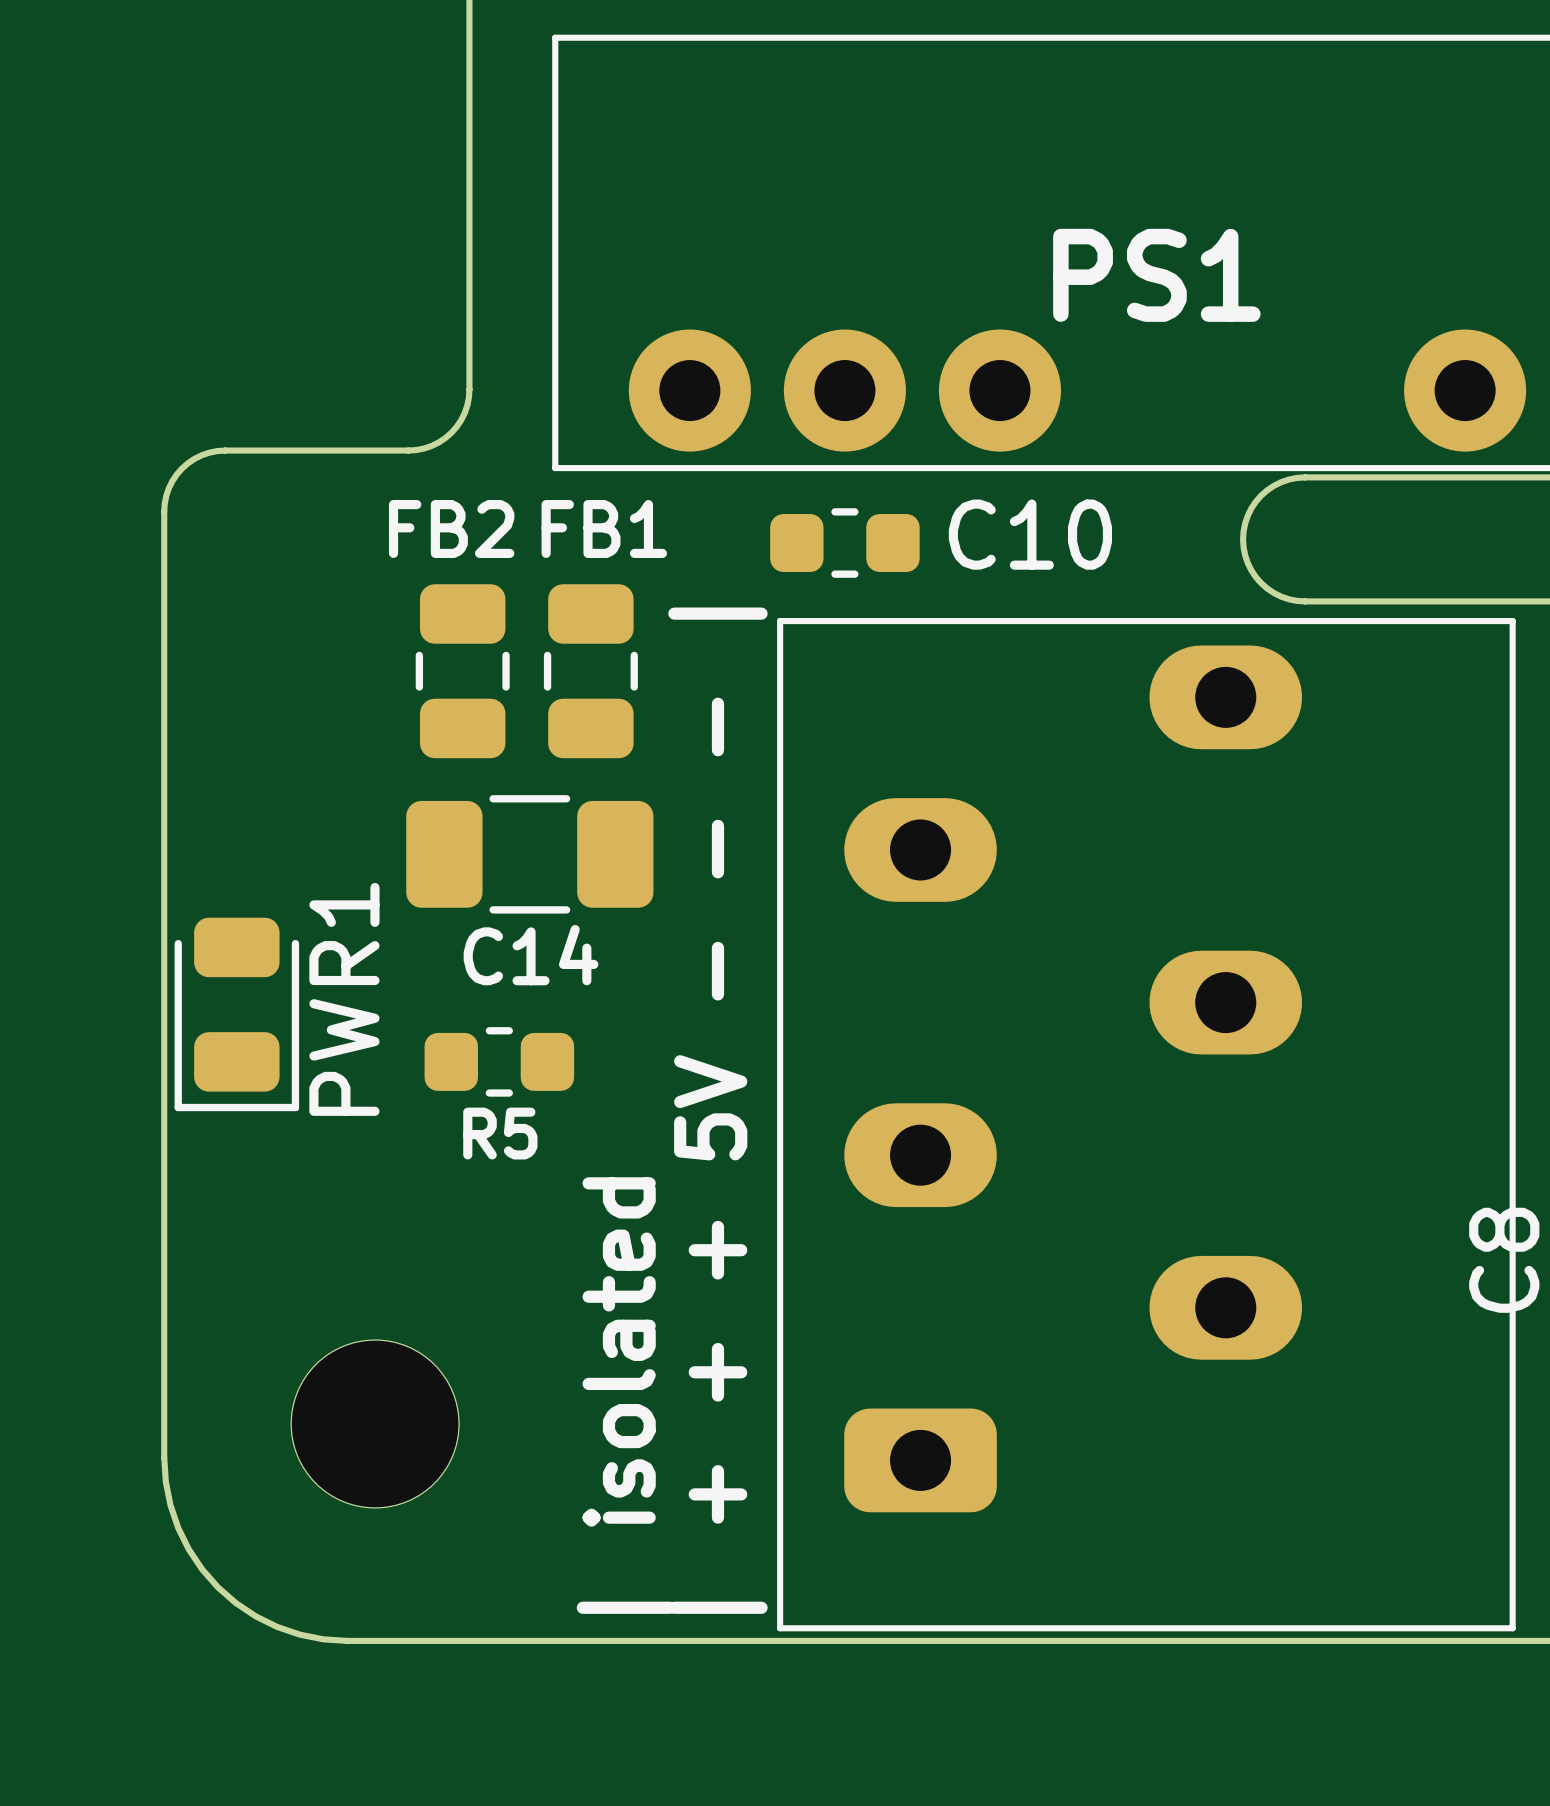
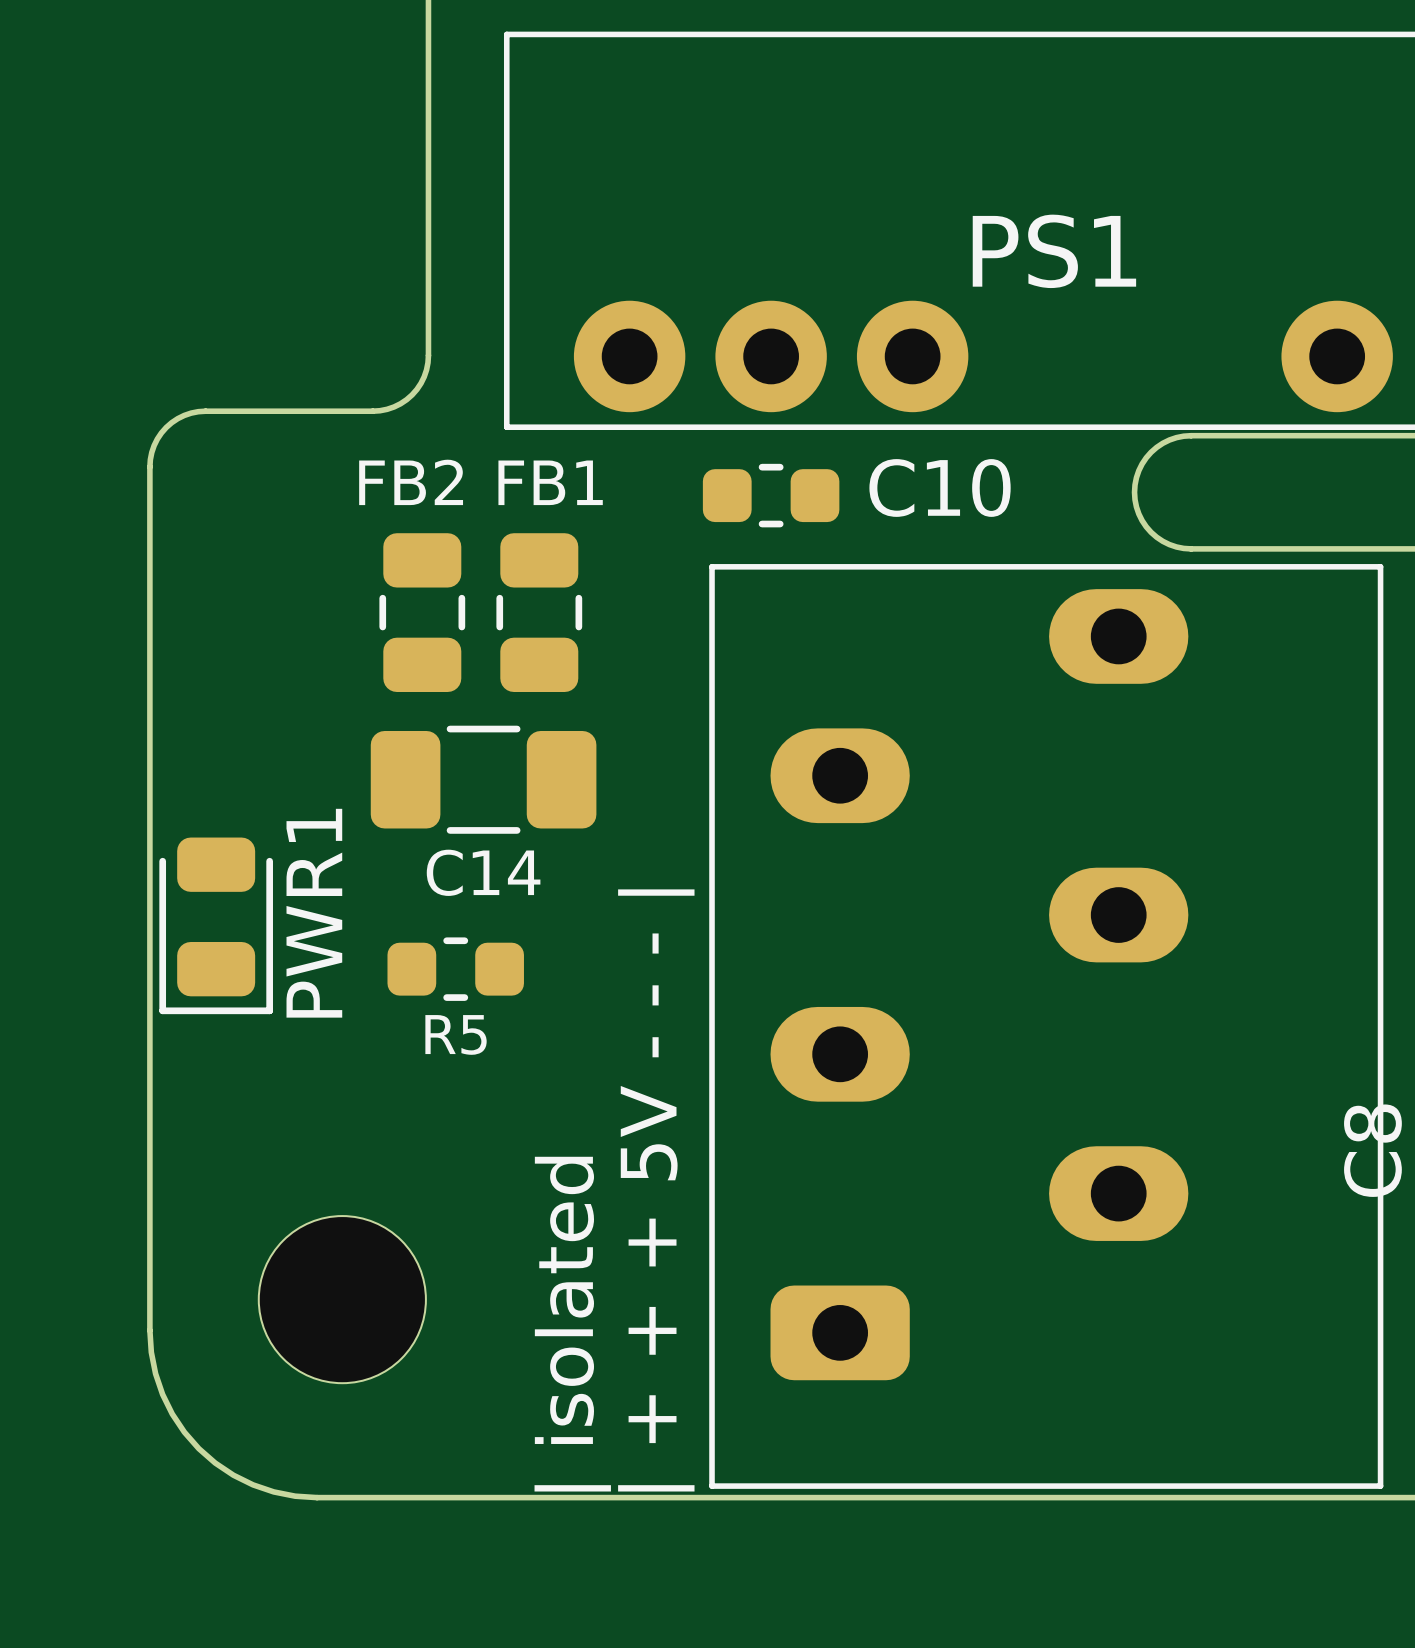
part footprint: [291, 1340, 460, 1508] -> [258, 1216, 426, 1384]

